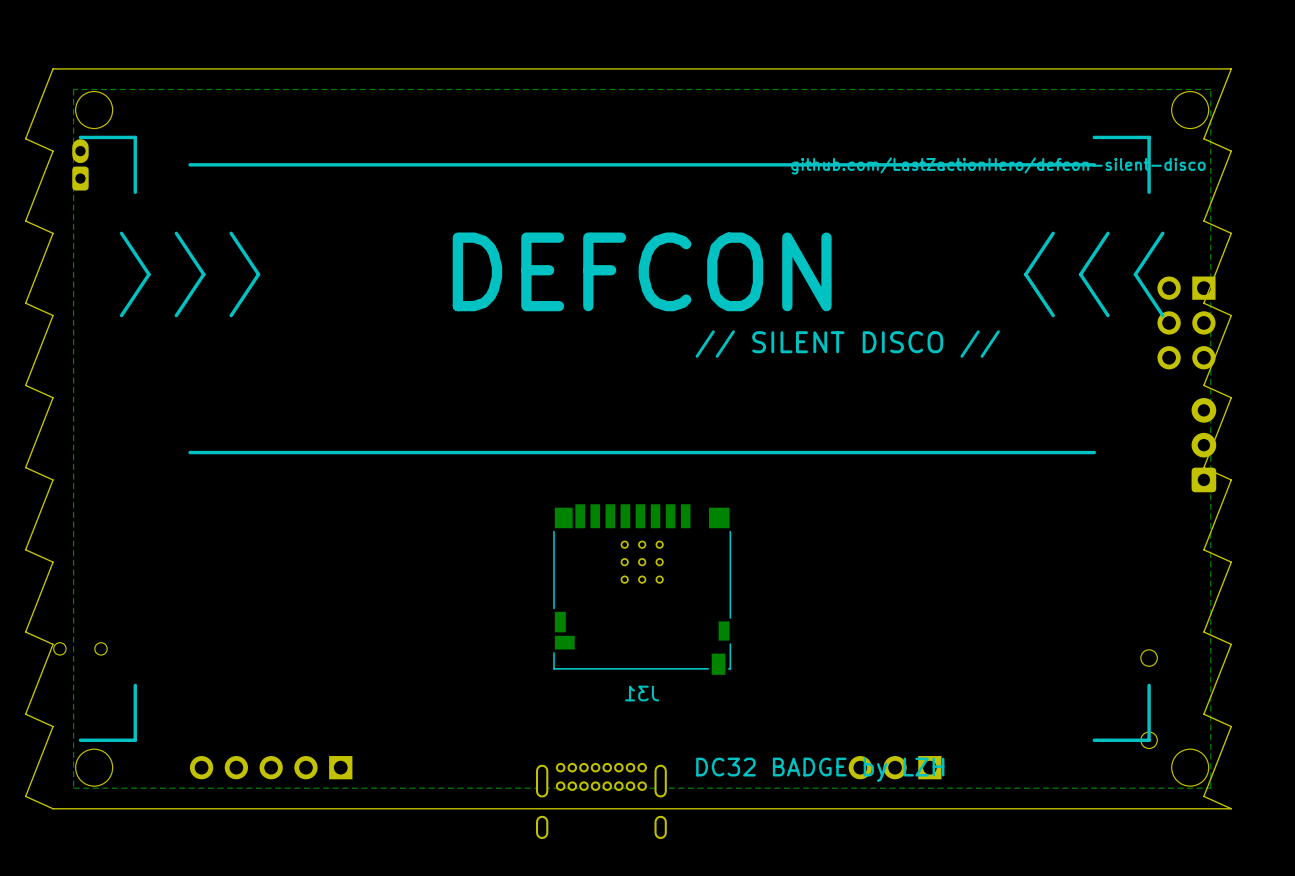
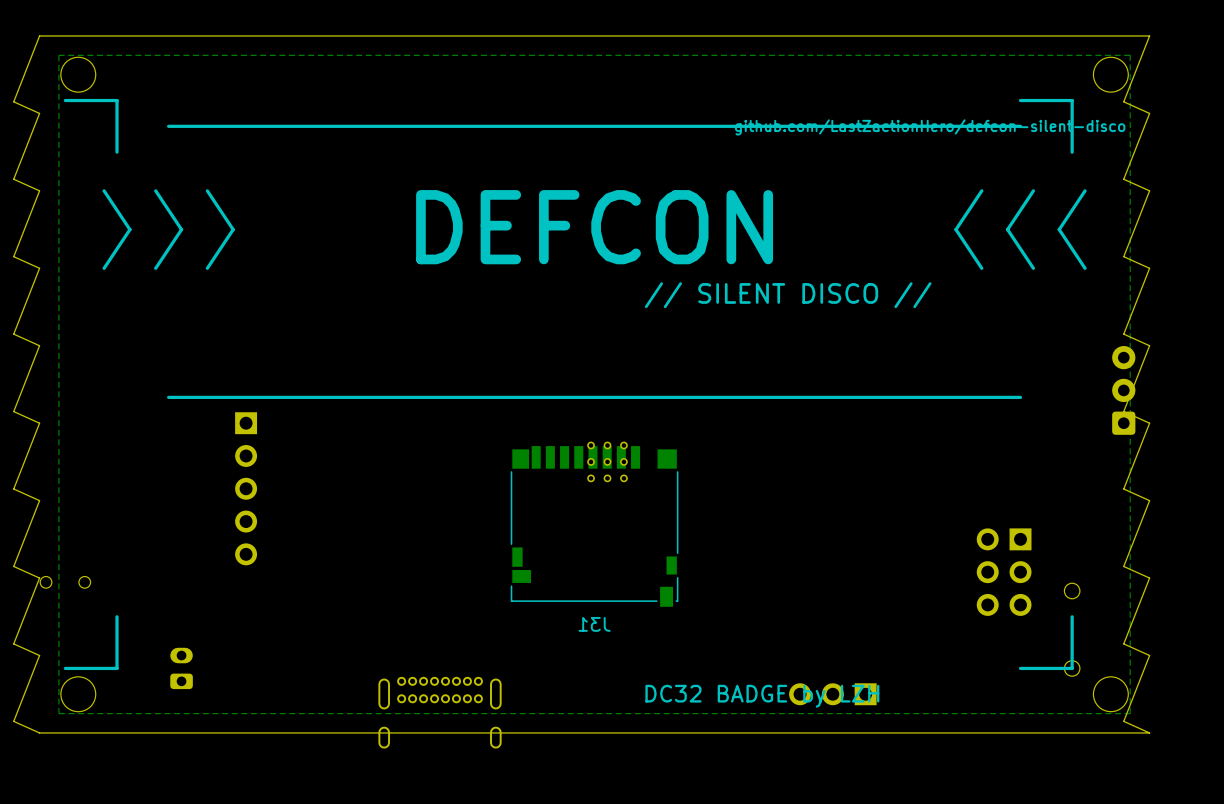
part: (80, 164) -> none
part position: (1186, 322) -> (1004, 572)
part position: (642, 562) -> (607, 461)
part: none -> (181, 668)
part rotation: 0° (271, 767) -> 90° counterclockwise (246, 488)
part position: (271, 767) -> (246, 488)
part position: (601, 800) -> (440, 712)

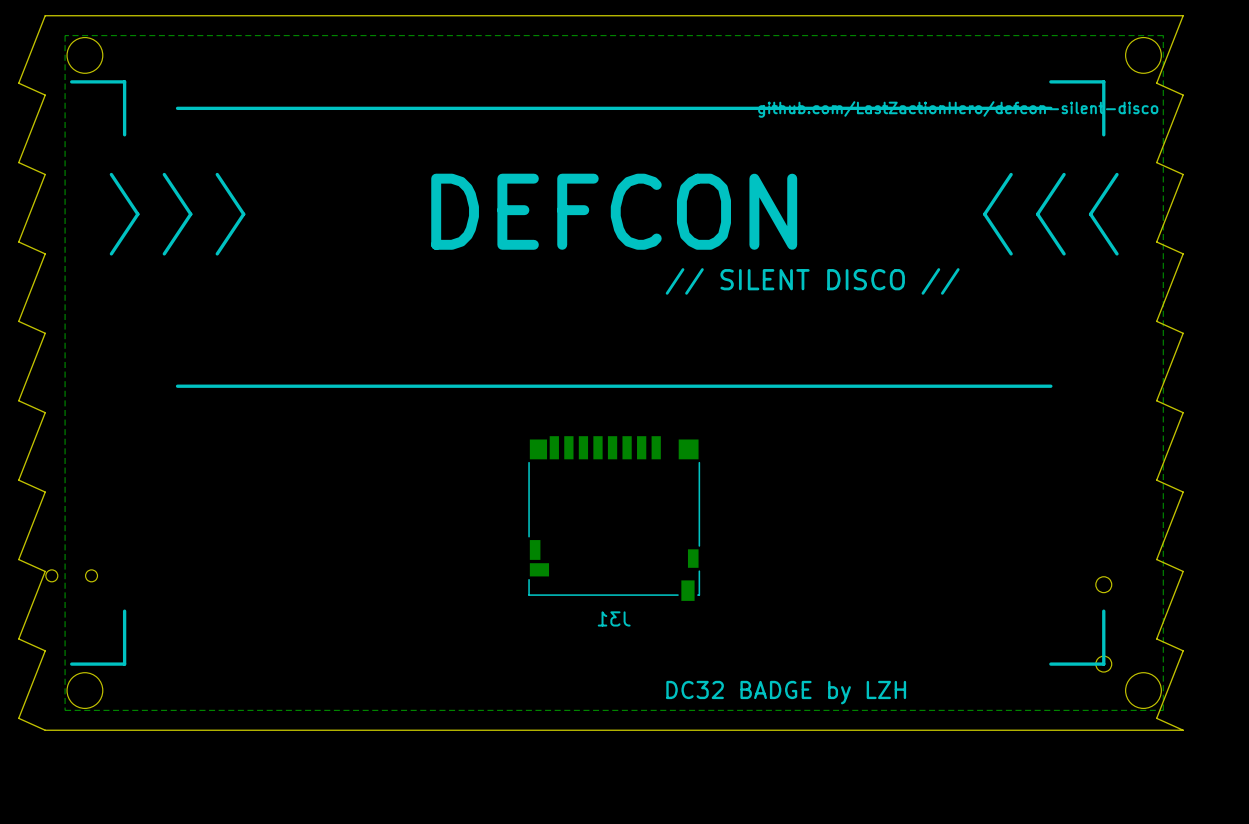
part: (1123, 390) -> none
part: (607, 461) -> none
part: (246, 488) -> none
part: (1004, 572) -> none
part: (181, 668) -> none
part: (832, 694) -> none
part: (440, 712) -> none

